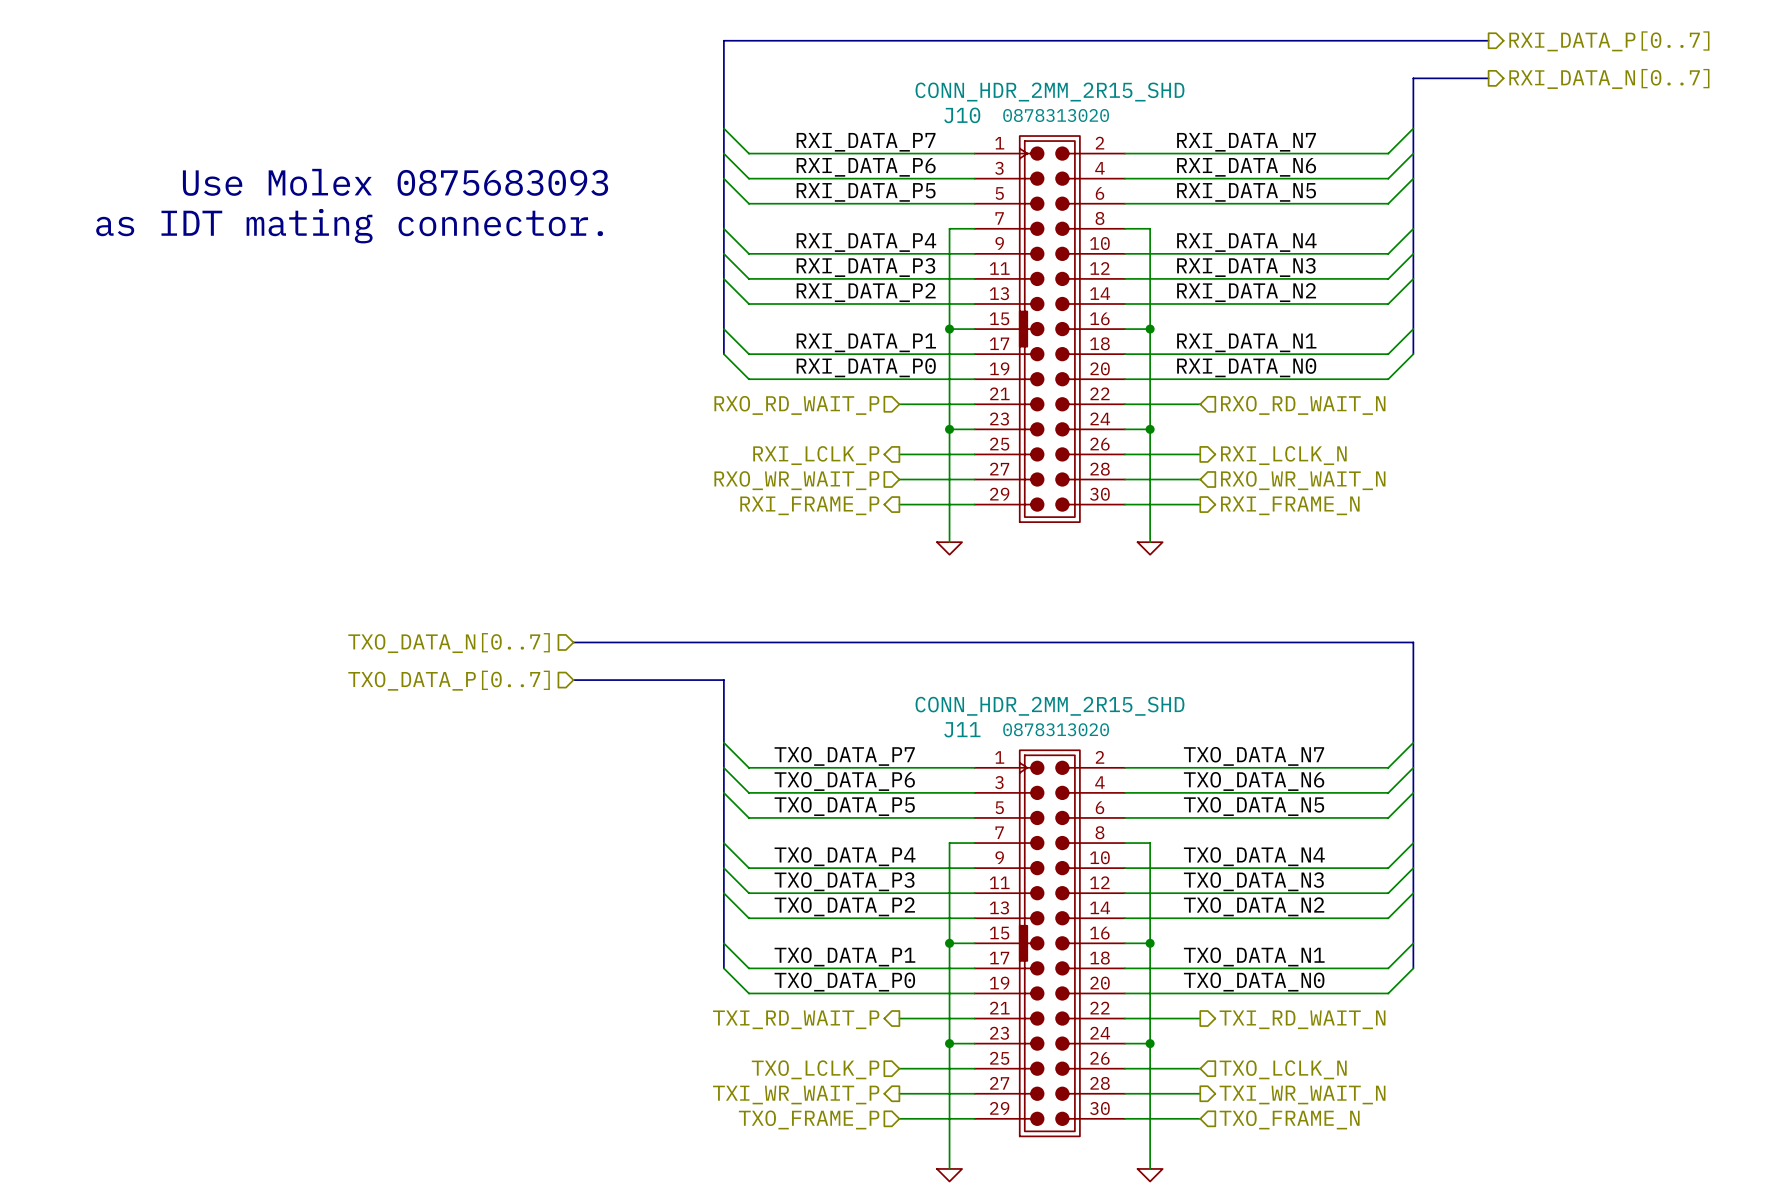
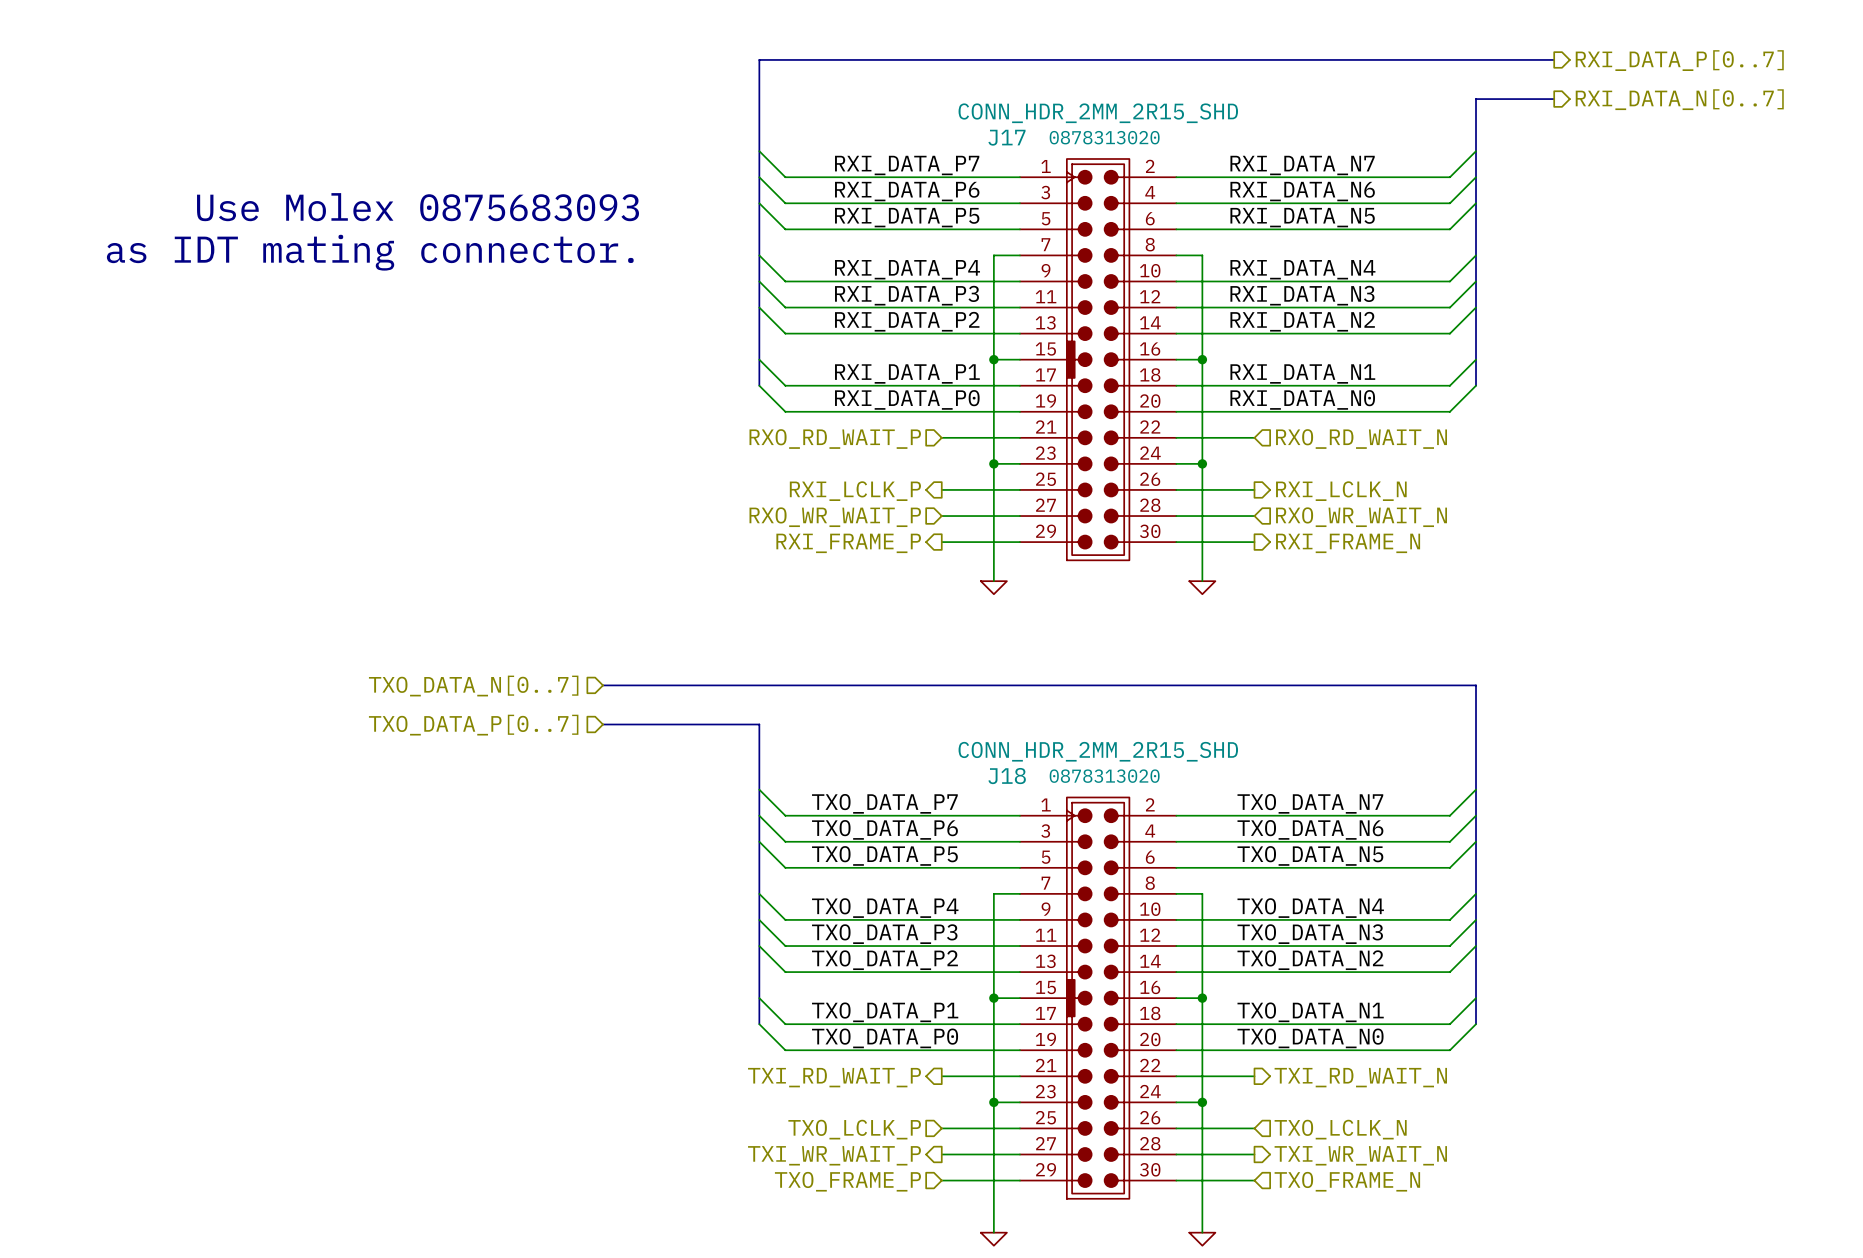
J10 name: J10 (962, 115) -> J17 (1006, 137)
J11 name: J11 (962, 729) -> J18 (1007, 776)

